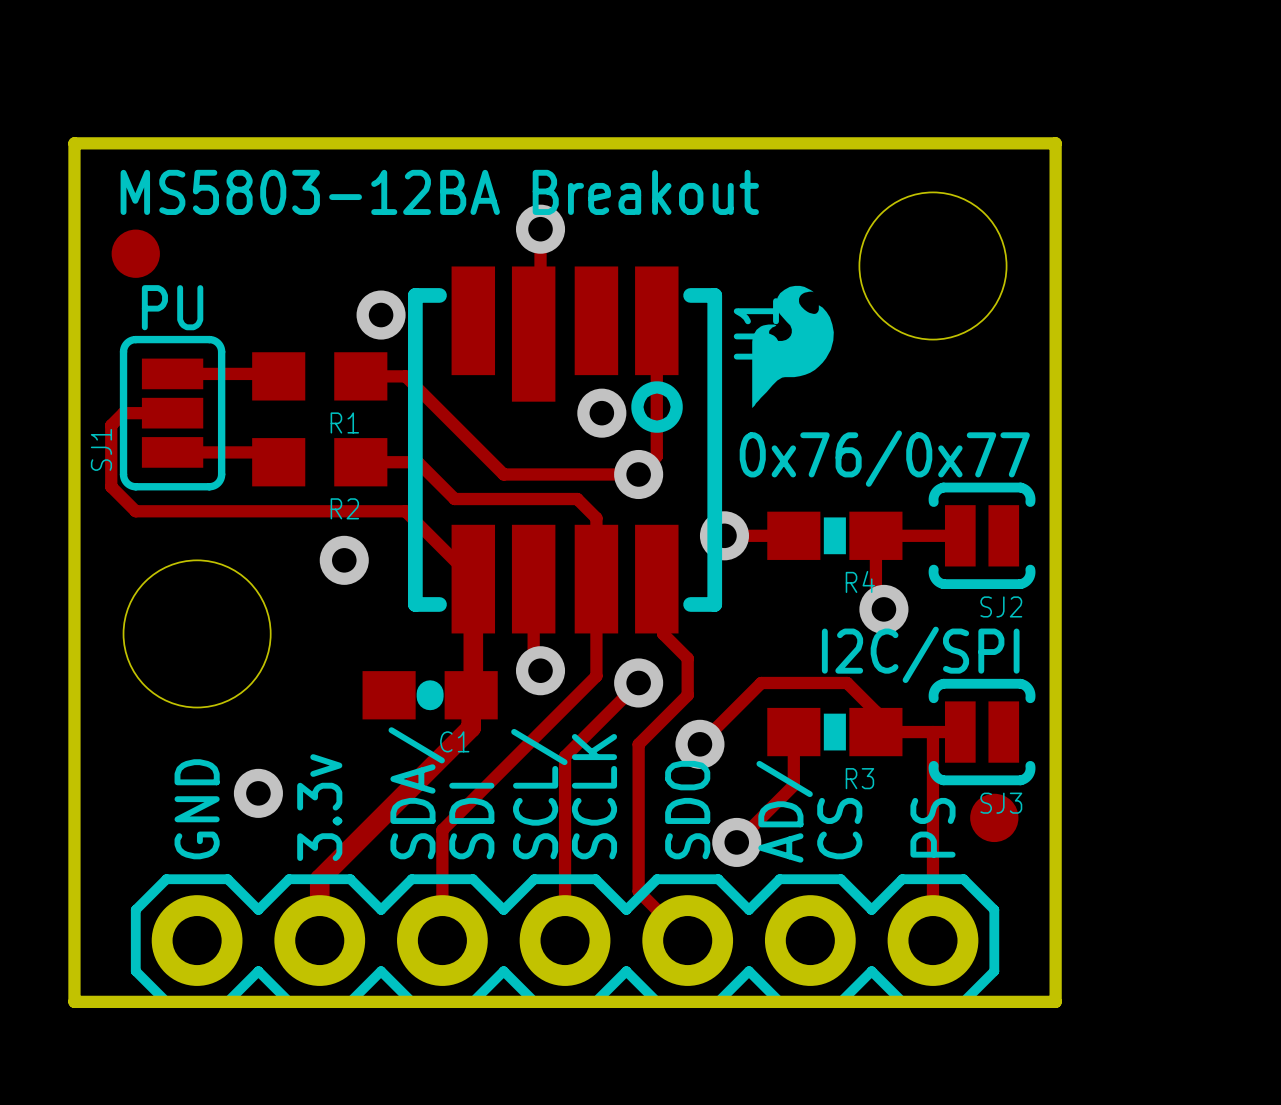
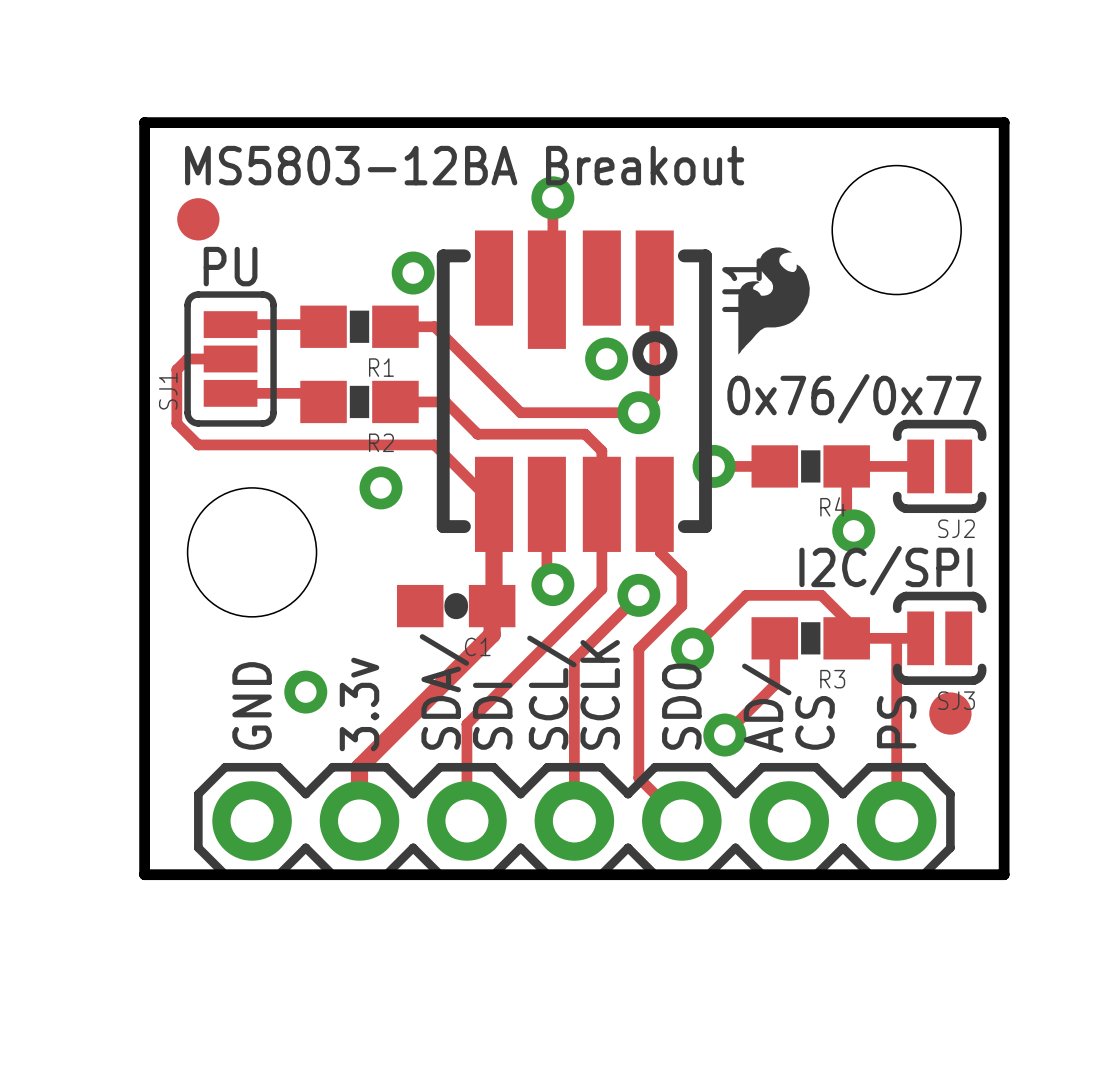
R1 footprint: [252, 352, 388, 401] -> [300, 305, 419, 348]
R2 footprint: [252, 438, 388, 487] -> [300, 380, 419, 424]

